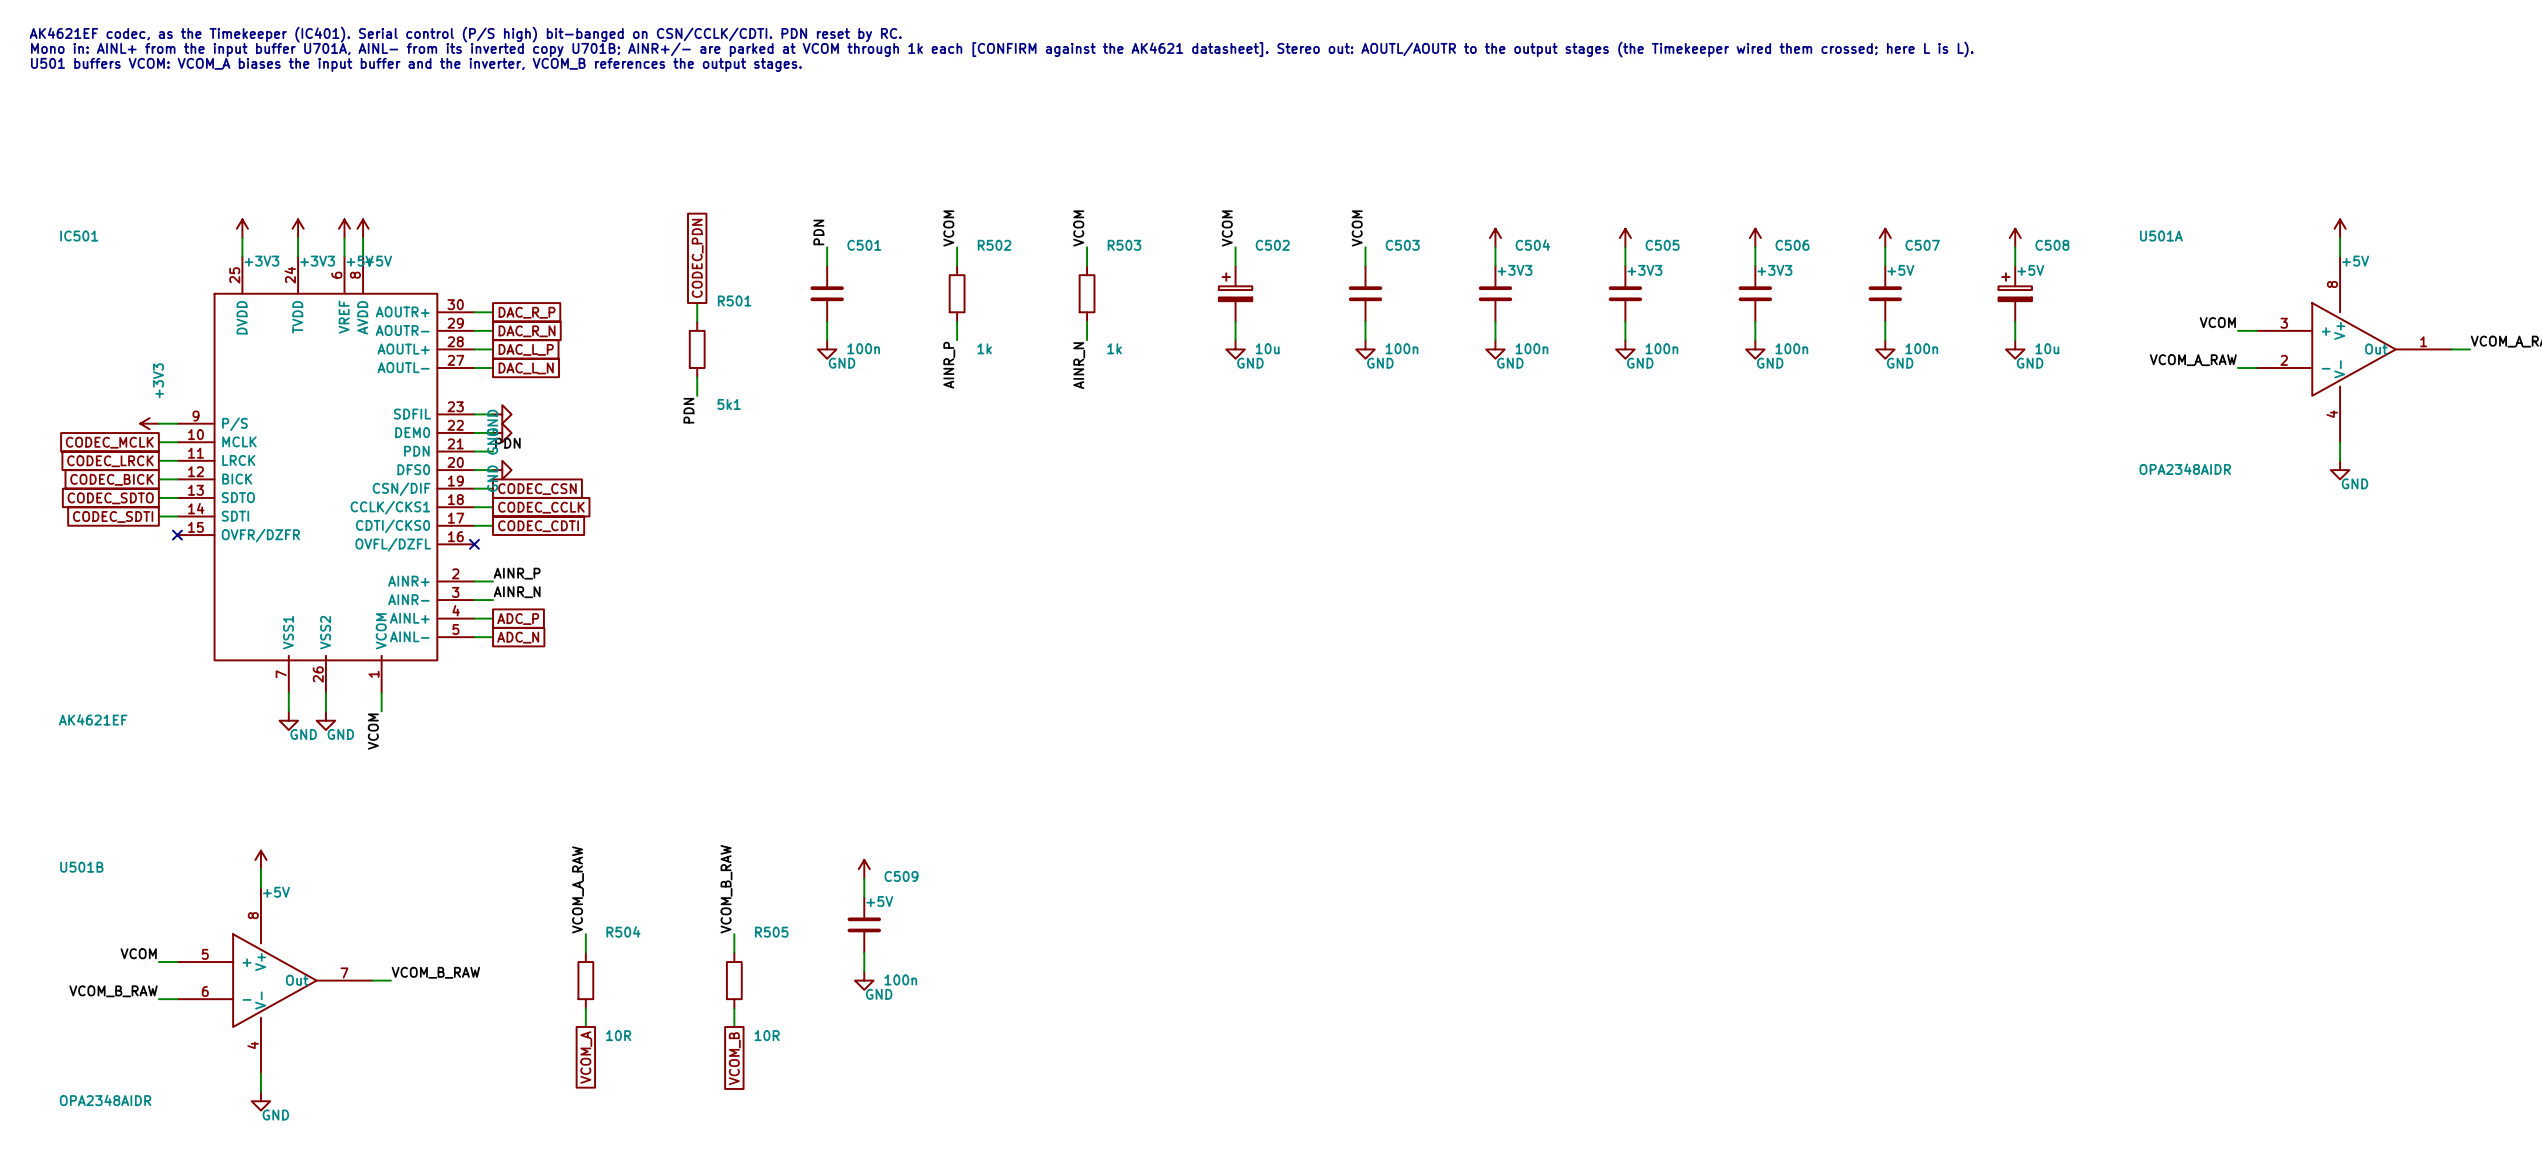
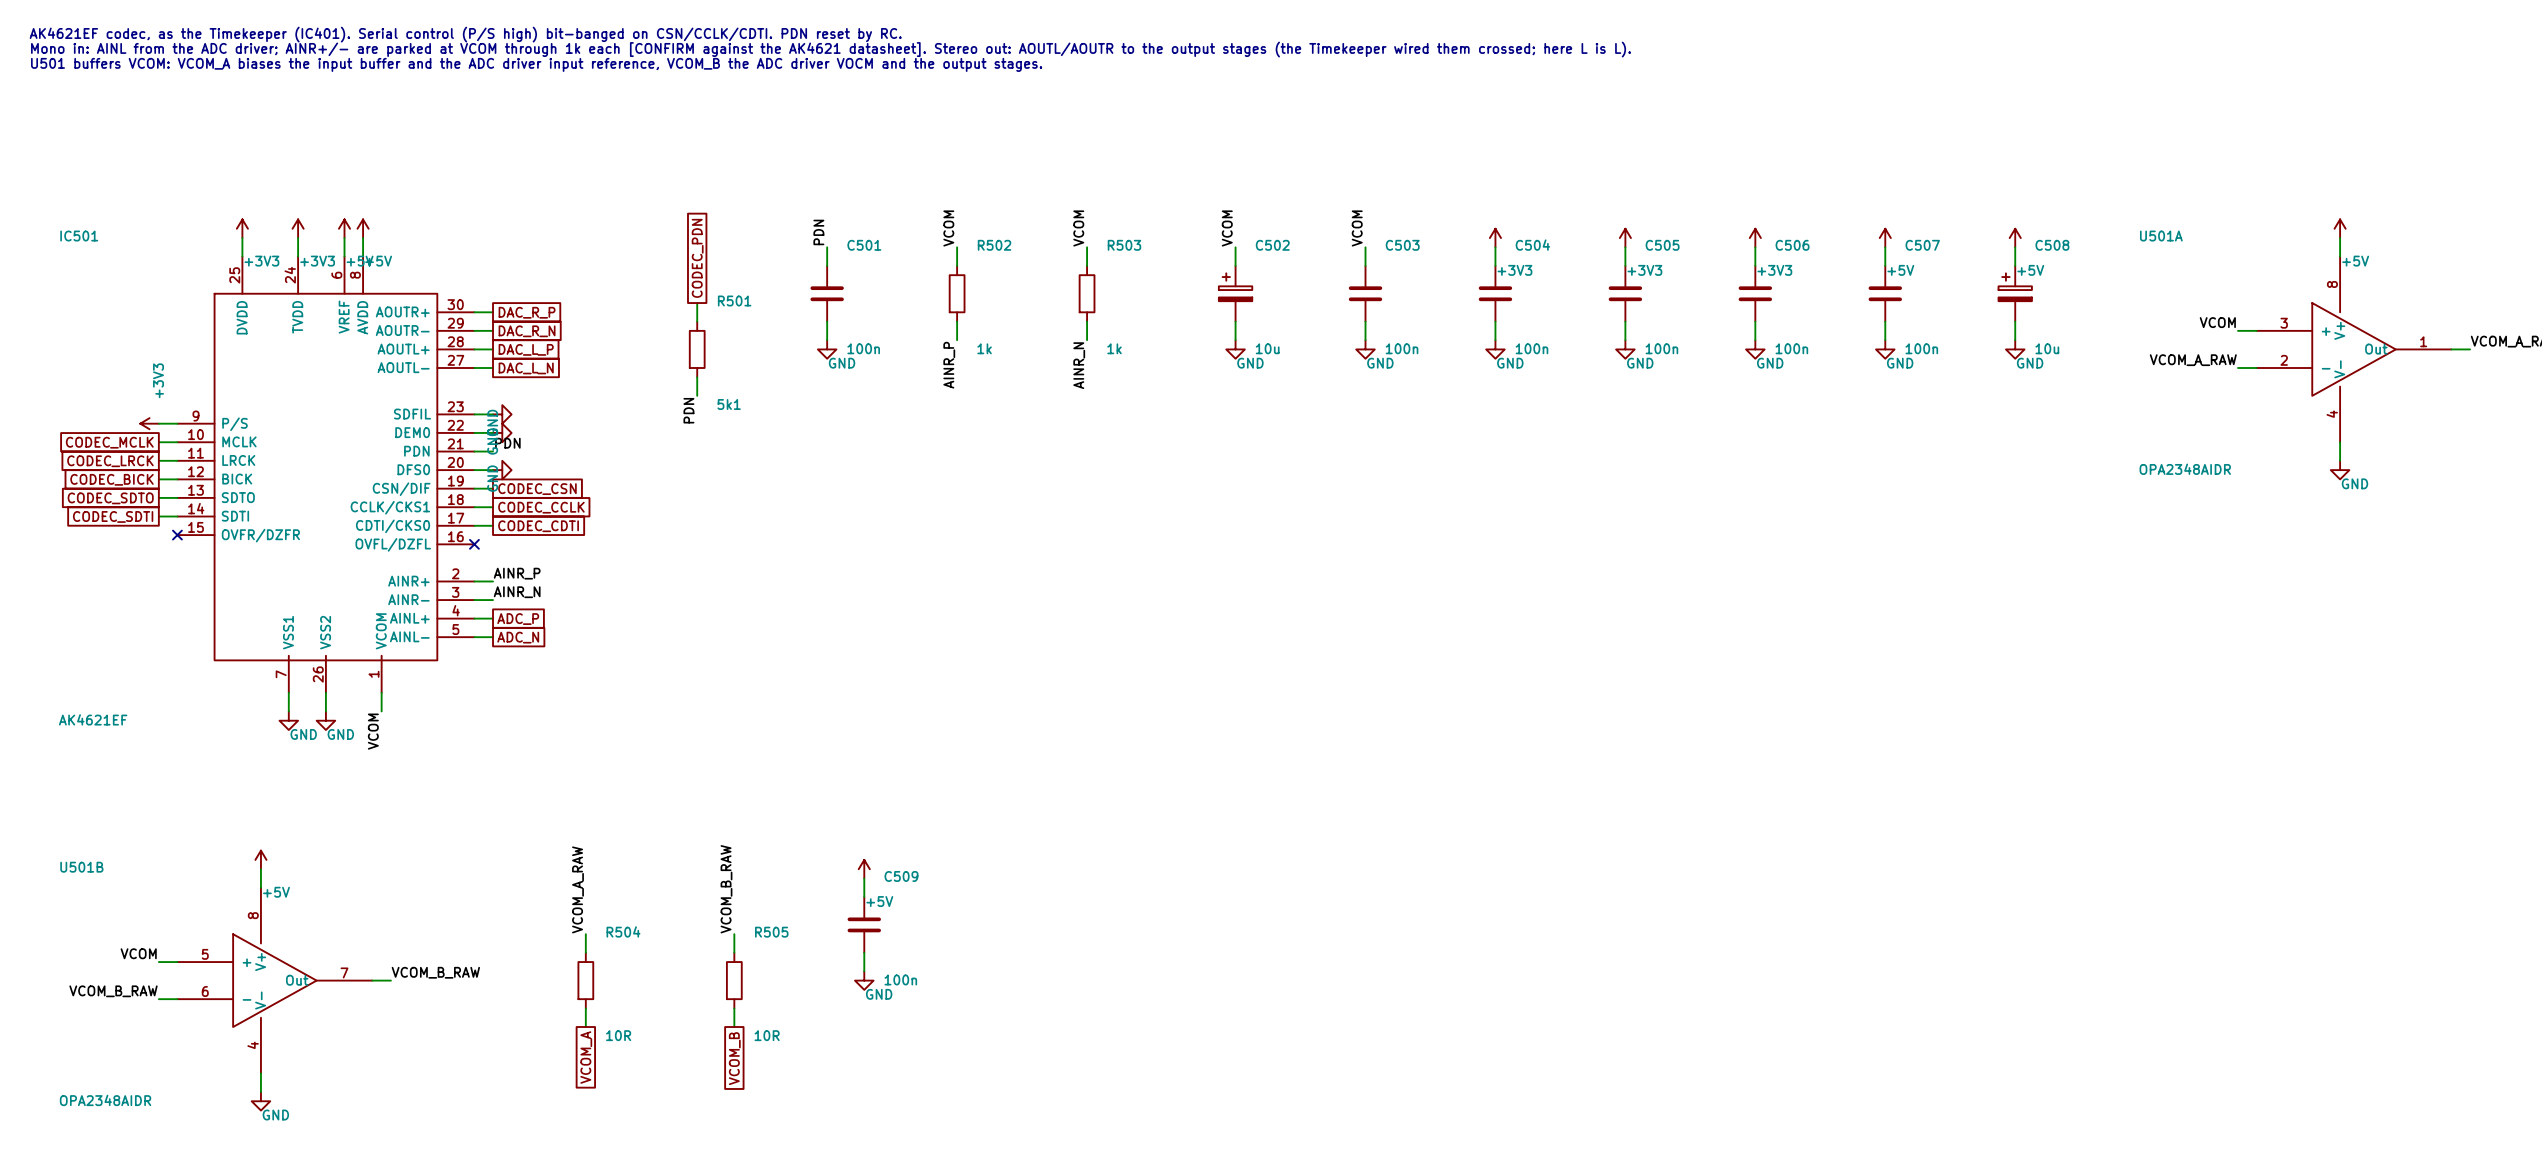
text: Mono in: AINL+ from the input buffer U701A, AINL- from its inverted copy U701B; AINR+/- are parked at VCOM through 1k each [CONFIRM against the AK4621 datasheet]. Stereo out: AOUTL/AOUTR to the output stages (the Timekeeper wired them crossed; here L is L). (1002, 49) -> Mono in: AINL from the ADC driver; AINR+/- are parked at VCOM through 1k each [CONFIRM against the AK4621 datasheet]. Stereo out: AOUTL/AOUTR to the output stages (the Timekeeper wired them crossed; here L is L). (830, 49)
text: U501 buffers VCOM: VCOM_A biases the input buffer and the inverter, VCOM_B references the output stages. (416, 64) -> U501 buffers VCOM: VCOM_A biases the input buffer and the ADC driver input reference, VCOM_B the ADC driver VOCM and the output stages. (536, 64)

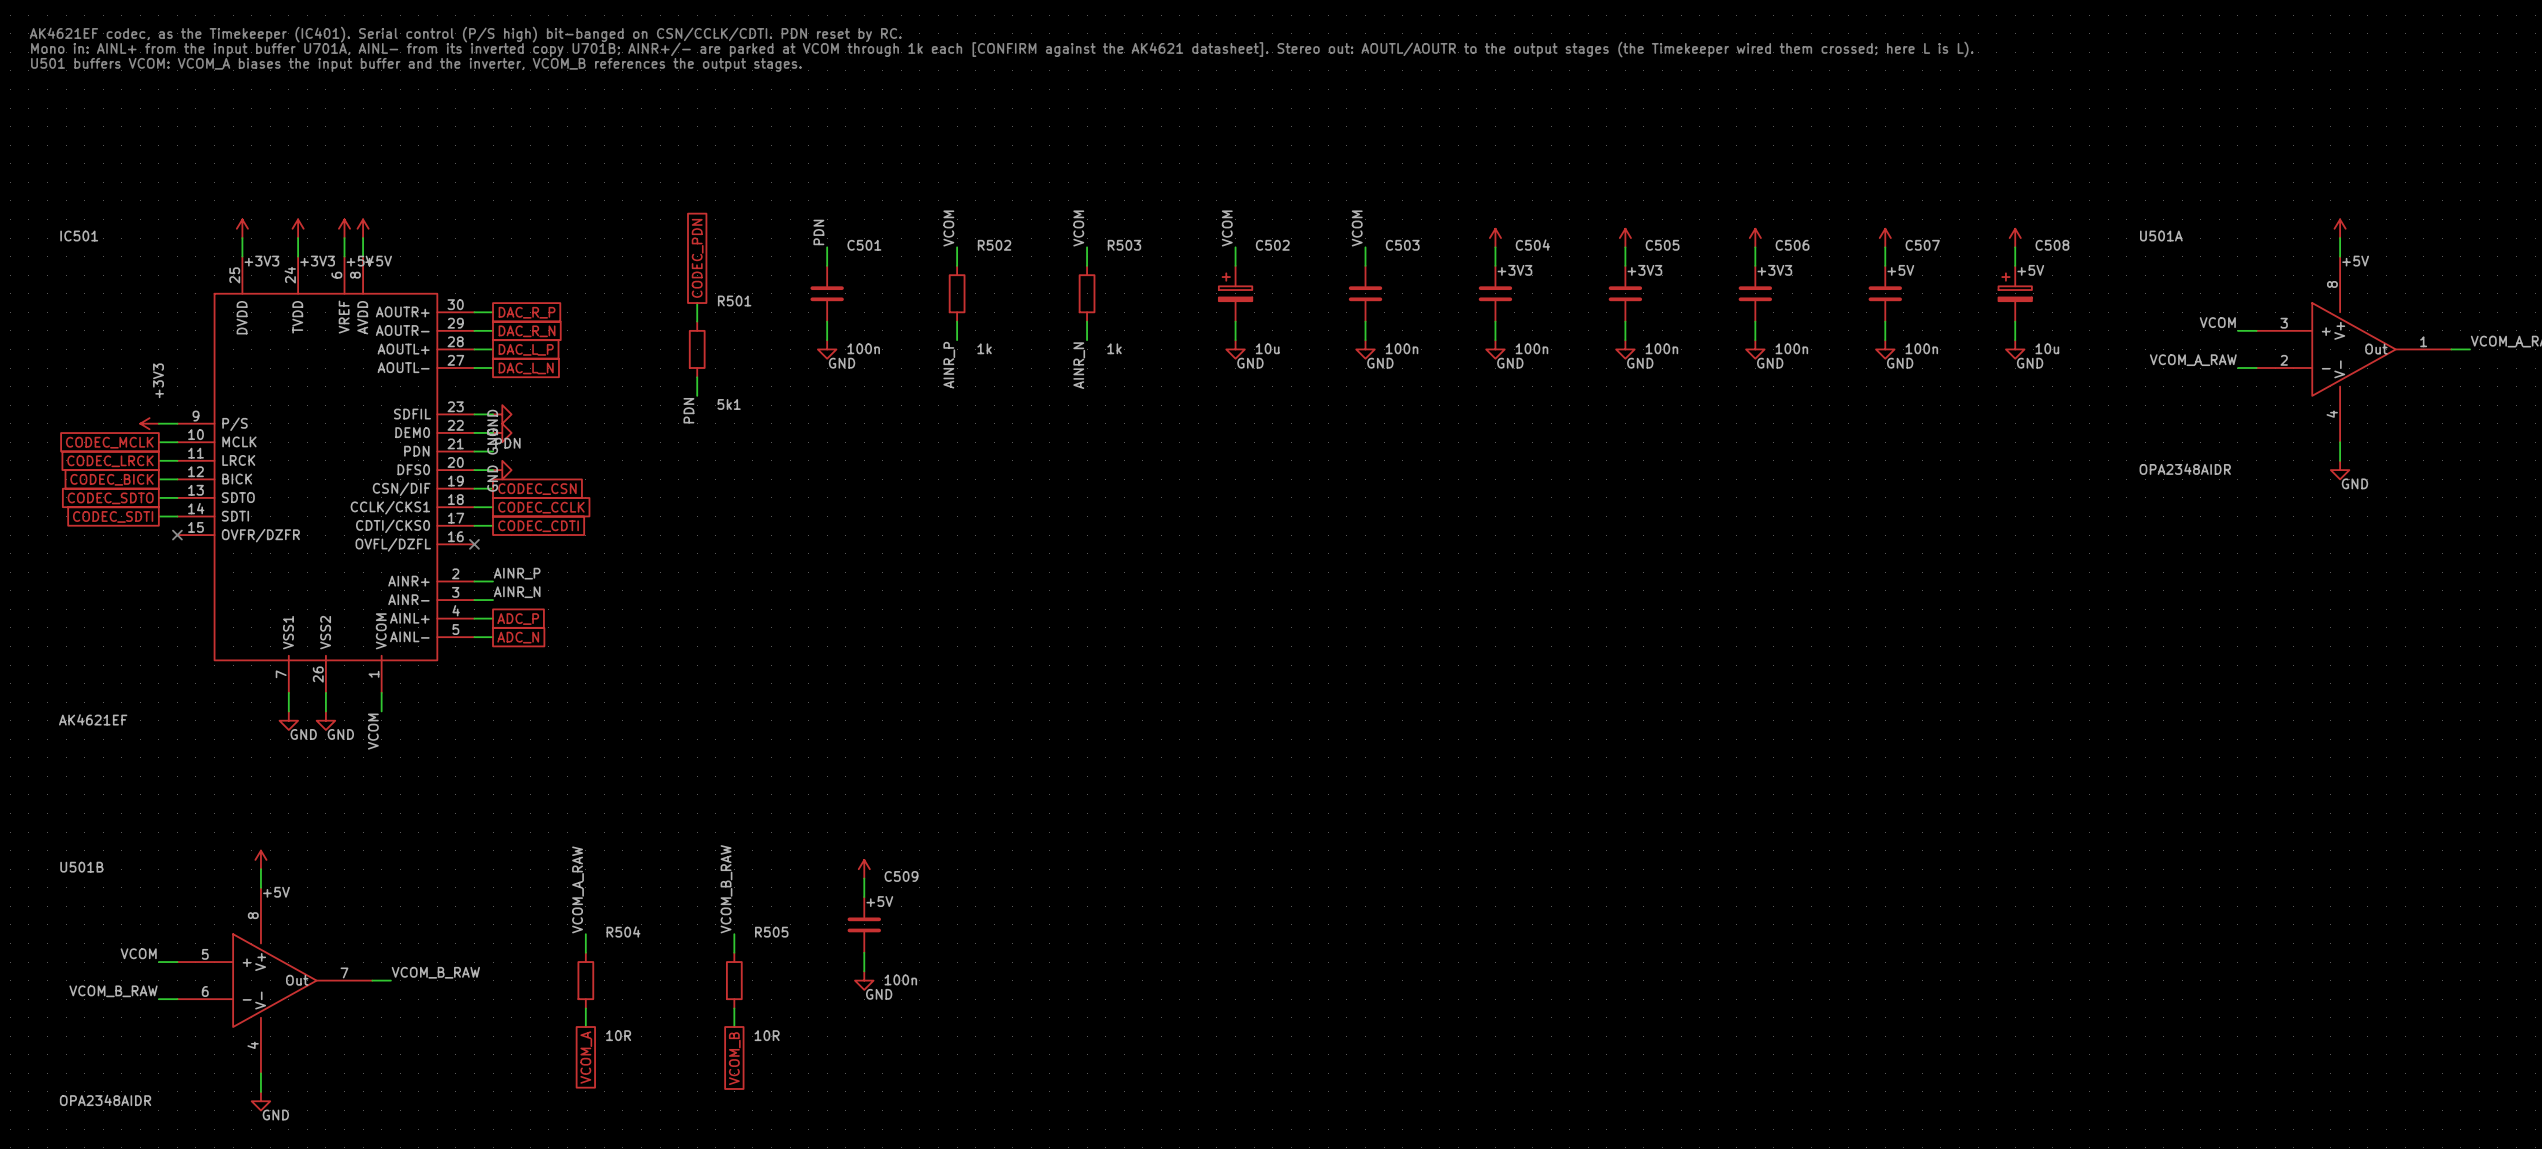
text: Mono in: AINL from the ADC driver; AINR+/- are parked at VCOM through 1k each [CONFIRM against the AK4621 datasheet]. Stereo out: AOUTL/AOUTR to the output stages (the Timekeeper wired them crossed; here L is L). (830, 49) -> Mono in: AINL+ from the input buffer U701A, AINL- from its inverted copy U701B; AINR+/- are parked at VCOM through 1k each [CONFIRM against the AK4621 datasheet]. Stereo out: AOUTL/AOUTR to the output stages (the Timekeeper wired them crossed; here L is L). (1002, 49)
text: U501 buffers VCOM: VCOM_A biases the input buffer and the ADC driver input reference, VCOM_B the ADC driver VOCM and the output stages. (536, 64) -> U501 buffers VCOM: VCOM_A biases the input buffer and the inverter, VCOM_B references the output stages. (416, 64)

